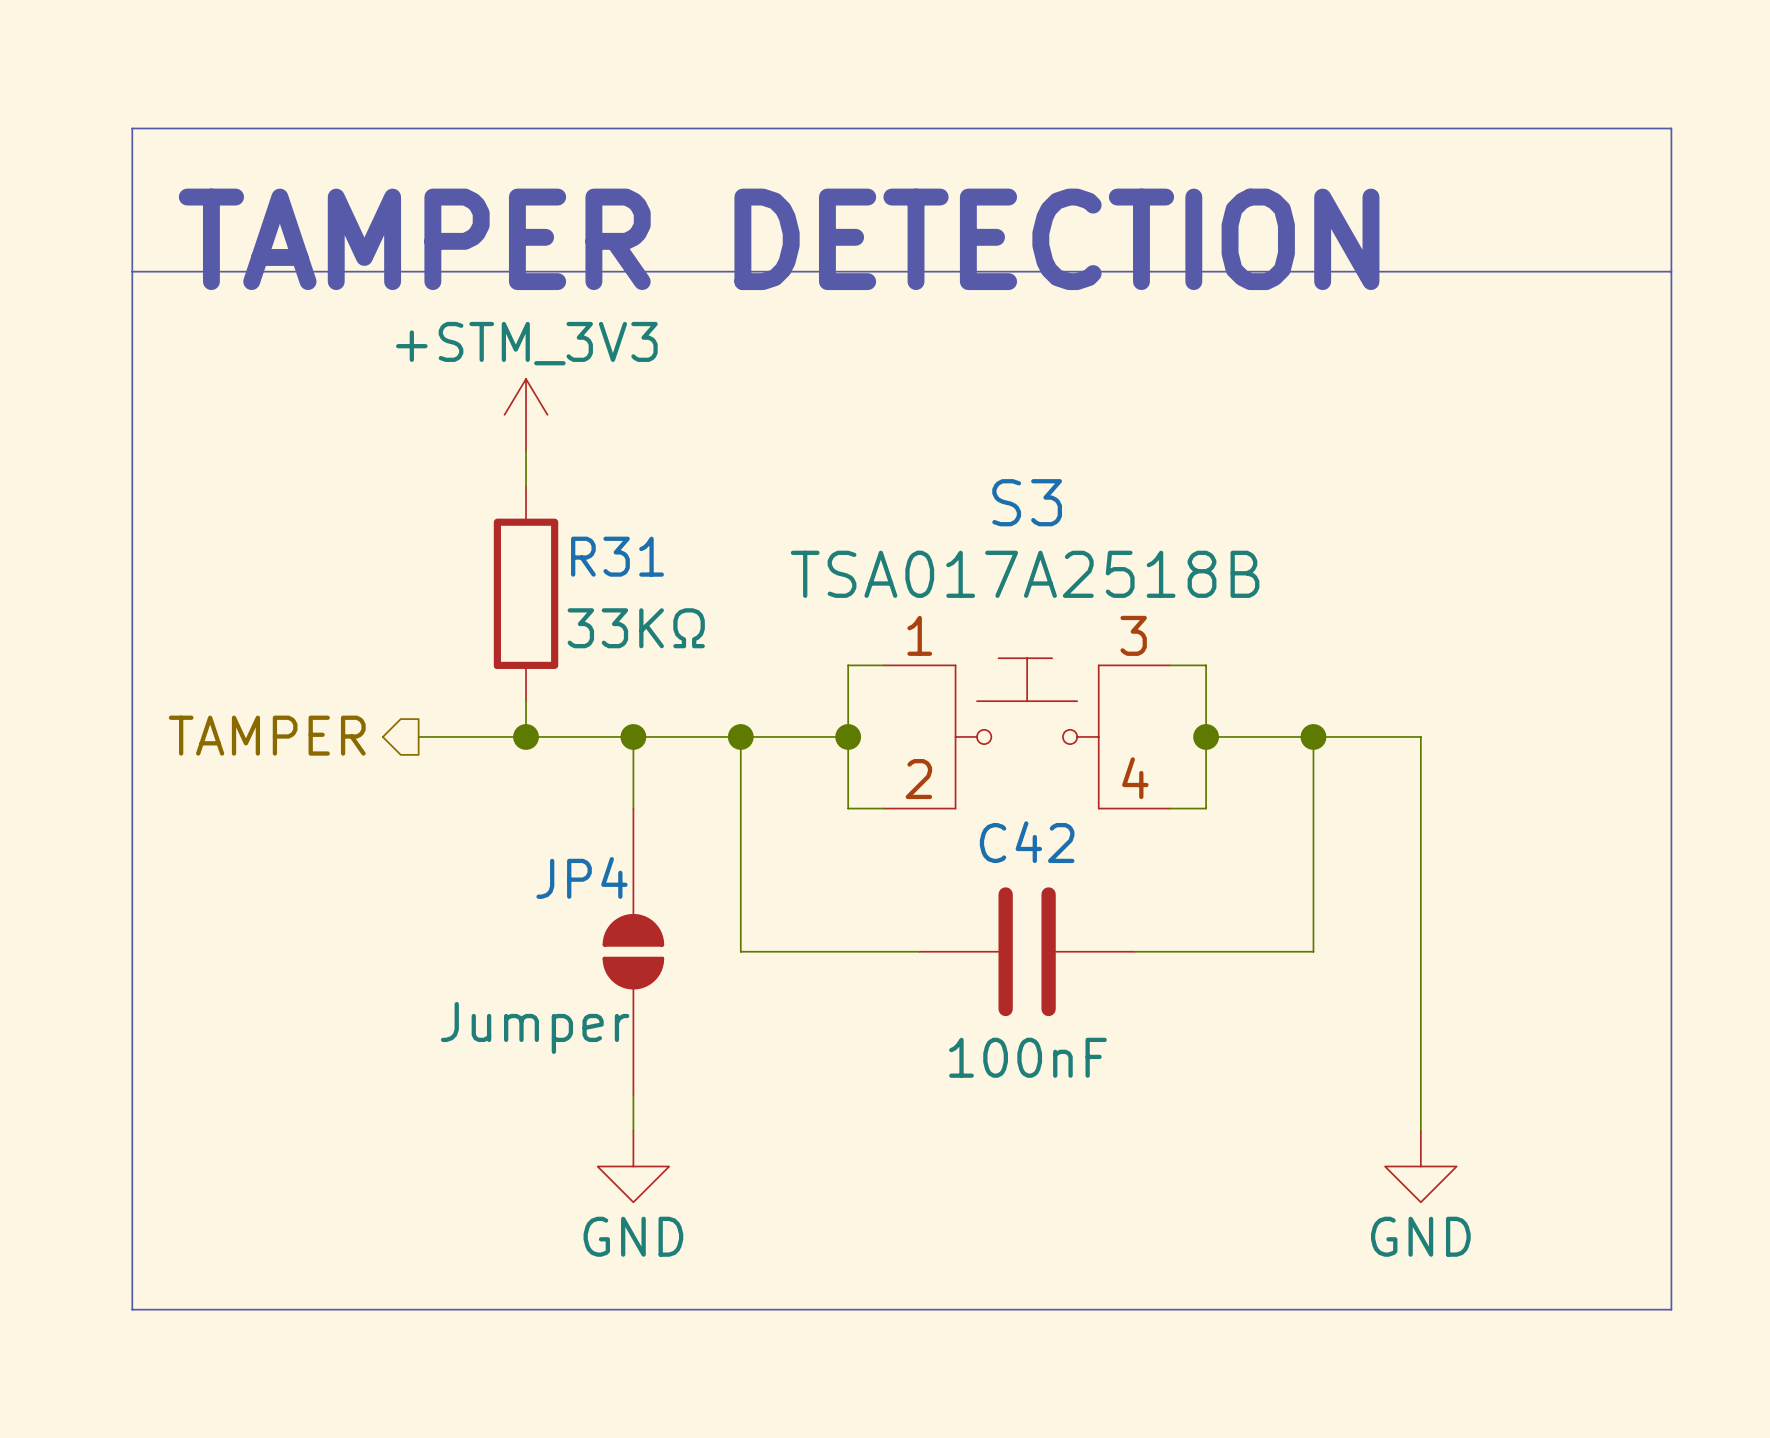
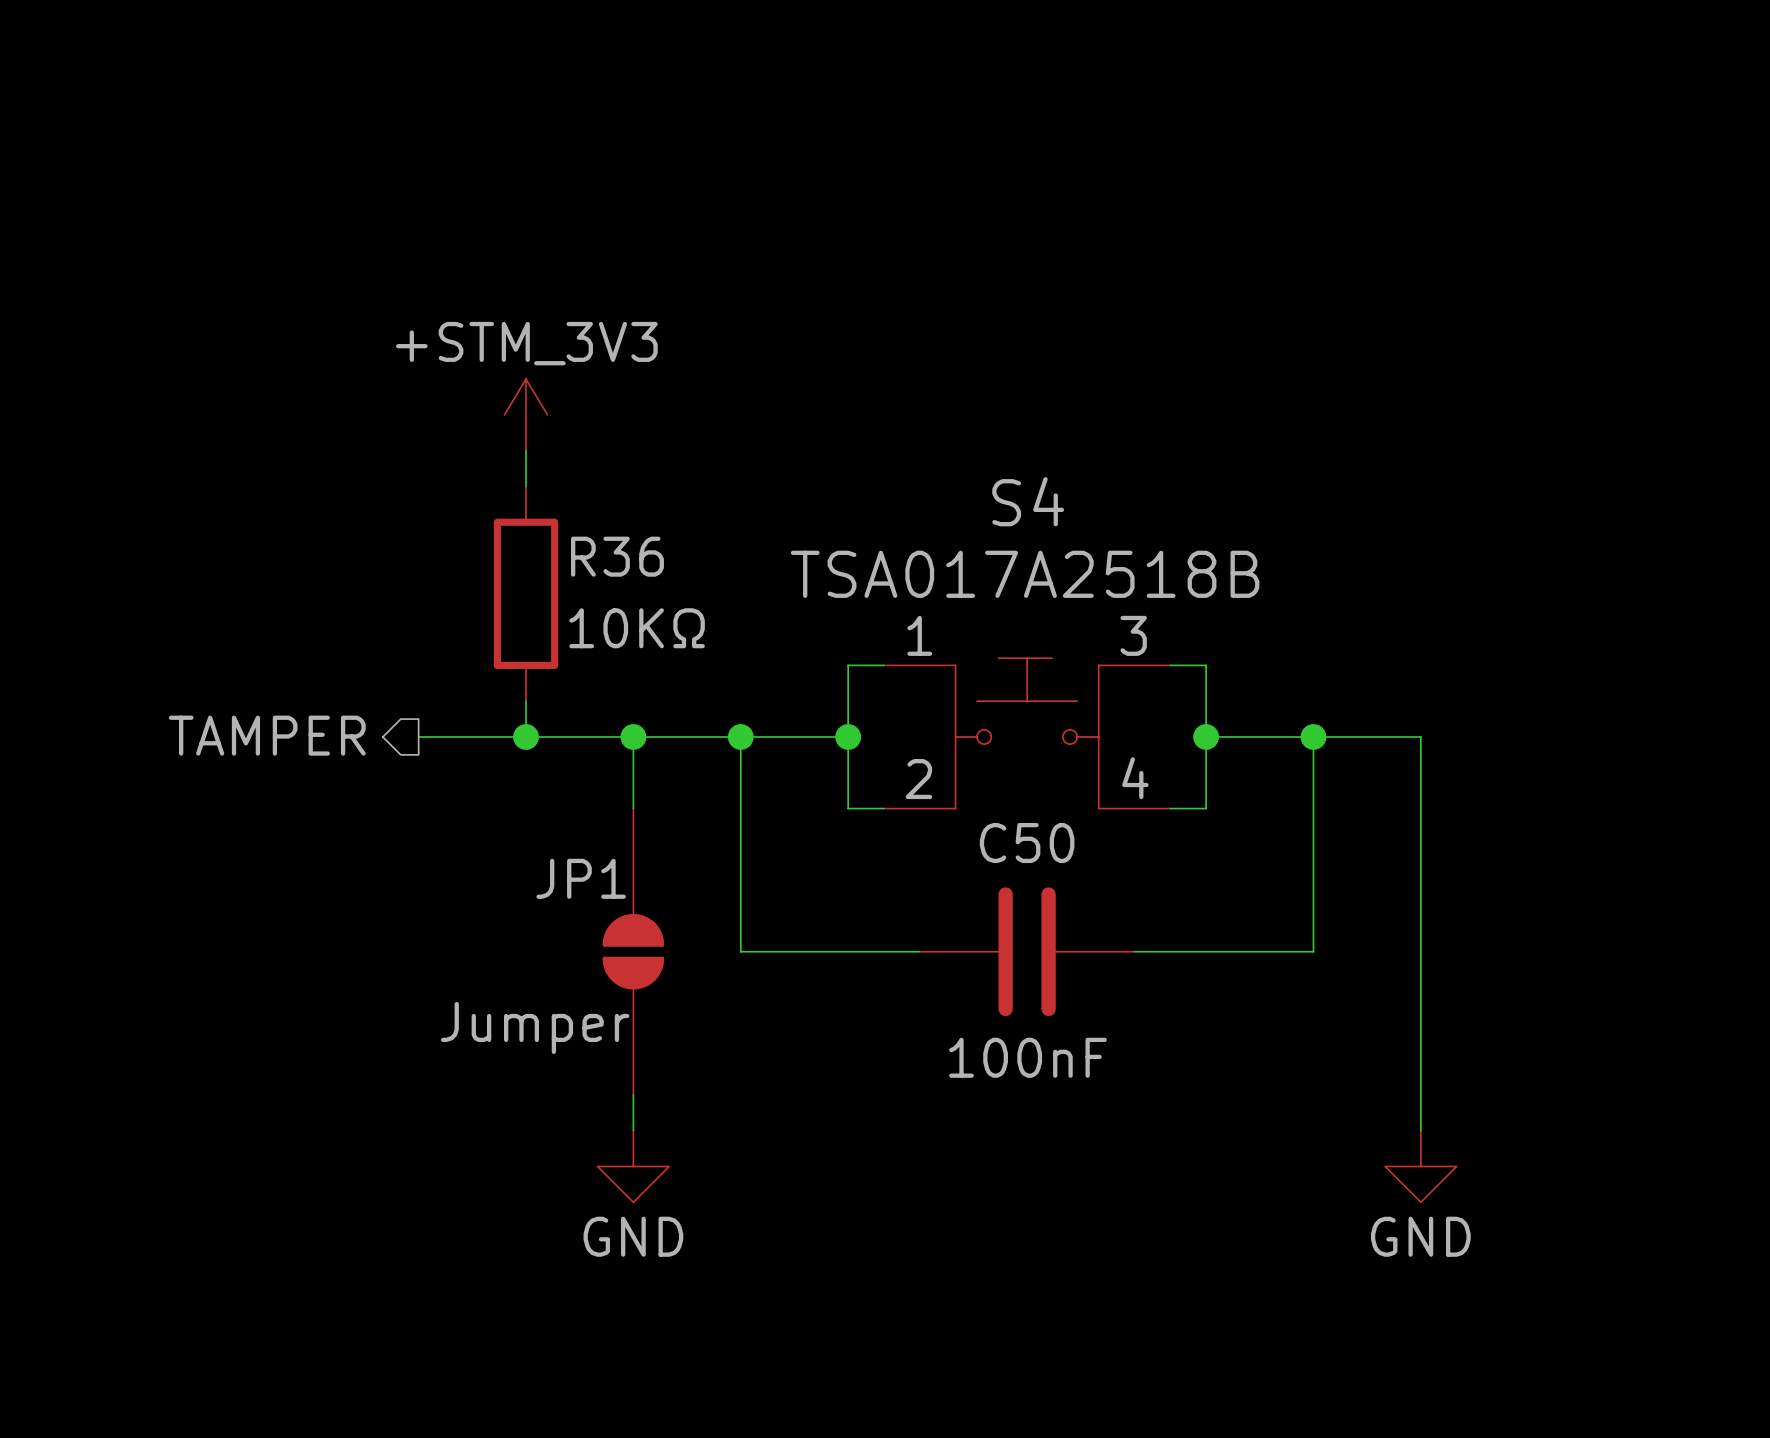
line: (132, 128) (1671, 128) (1671, 1309) (132, 1309) (132, 128) -> none
text: TAMPER DETECTION (779, 239) -> none
line: (132, 271) (1671, 271) -> none
S3 name: S3 (1027, 502) -> S4 (1028, 501)
R31 name: R31 (617, 556) -> R36 (617, 556)
R31 value: 33KΩ (636, 628) -> 10KΩ (637, 628)
C42 name: C42 (1027, 842) -> C50 (1027, 843)
JP4 name: JP4 (582, 877) -> JP1 (581, 878)

